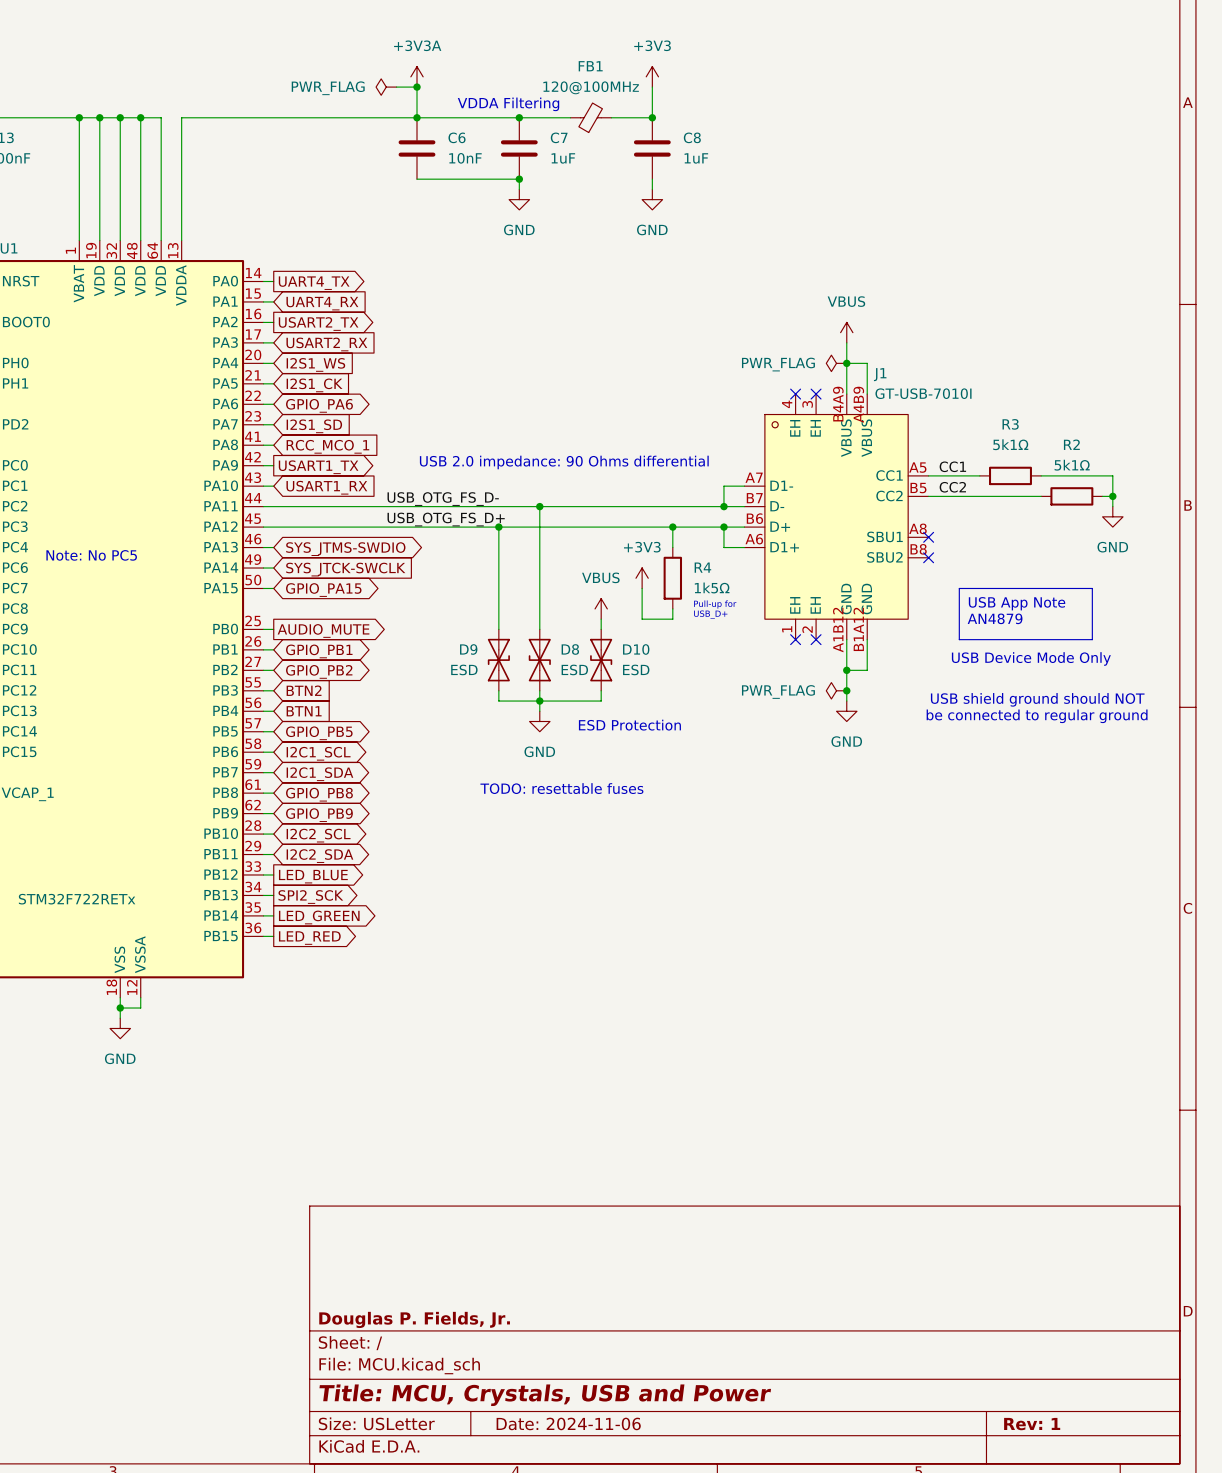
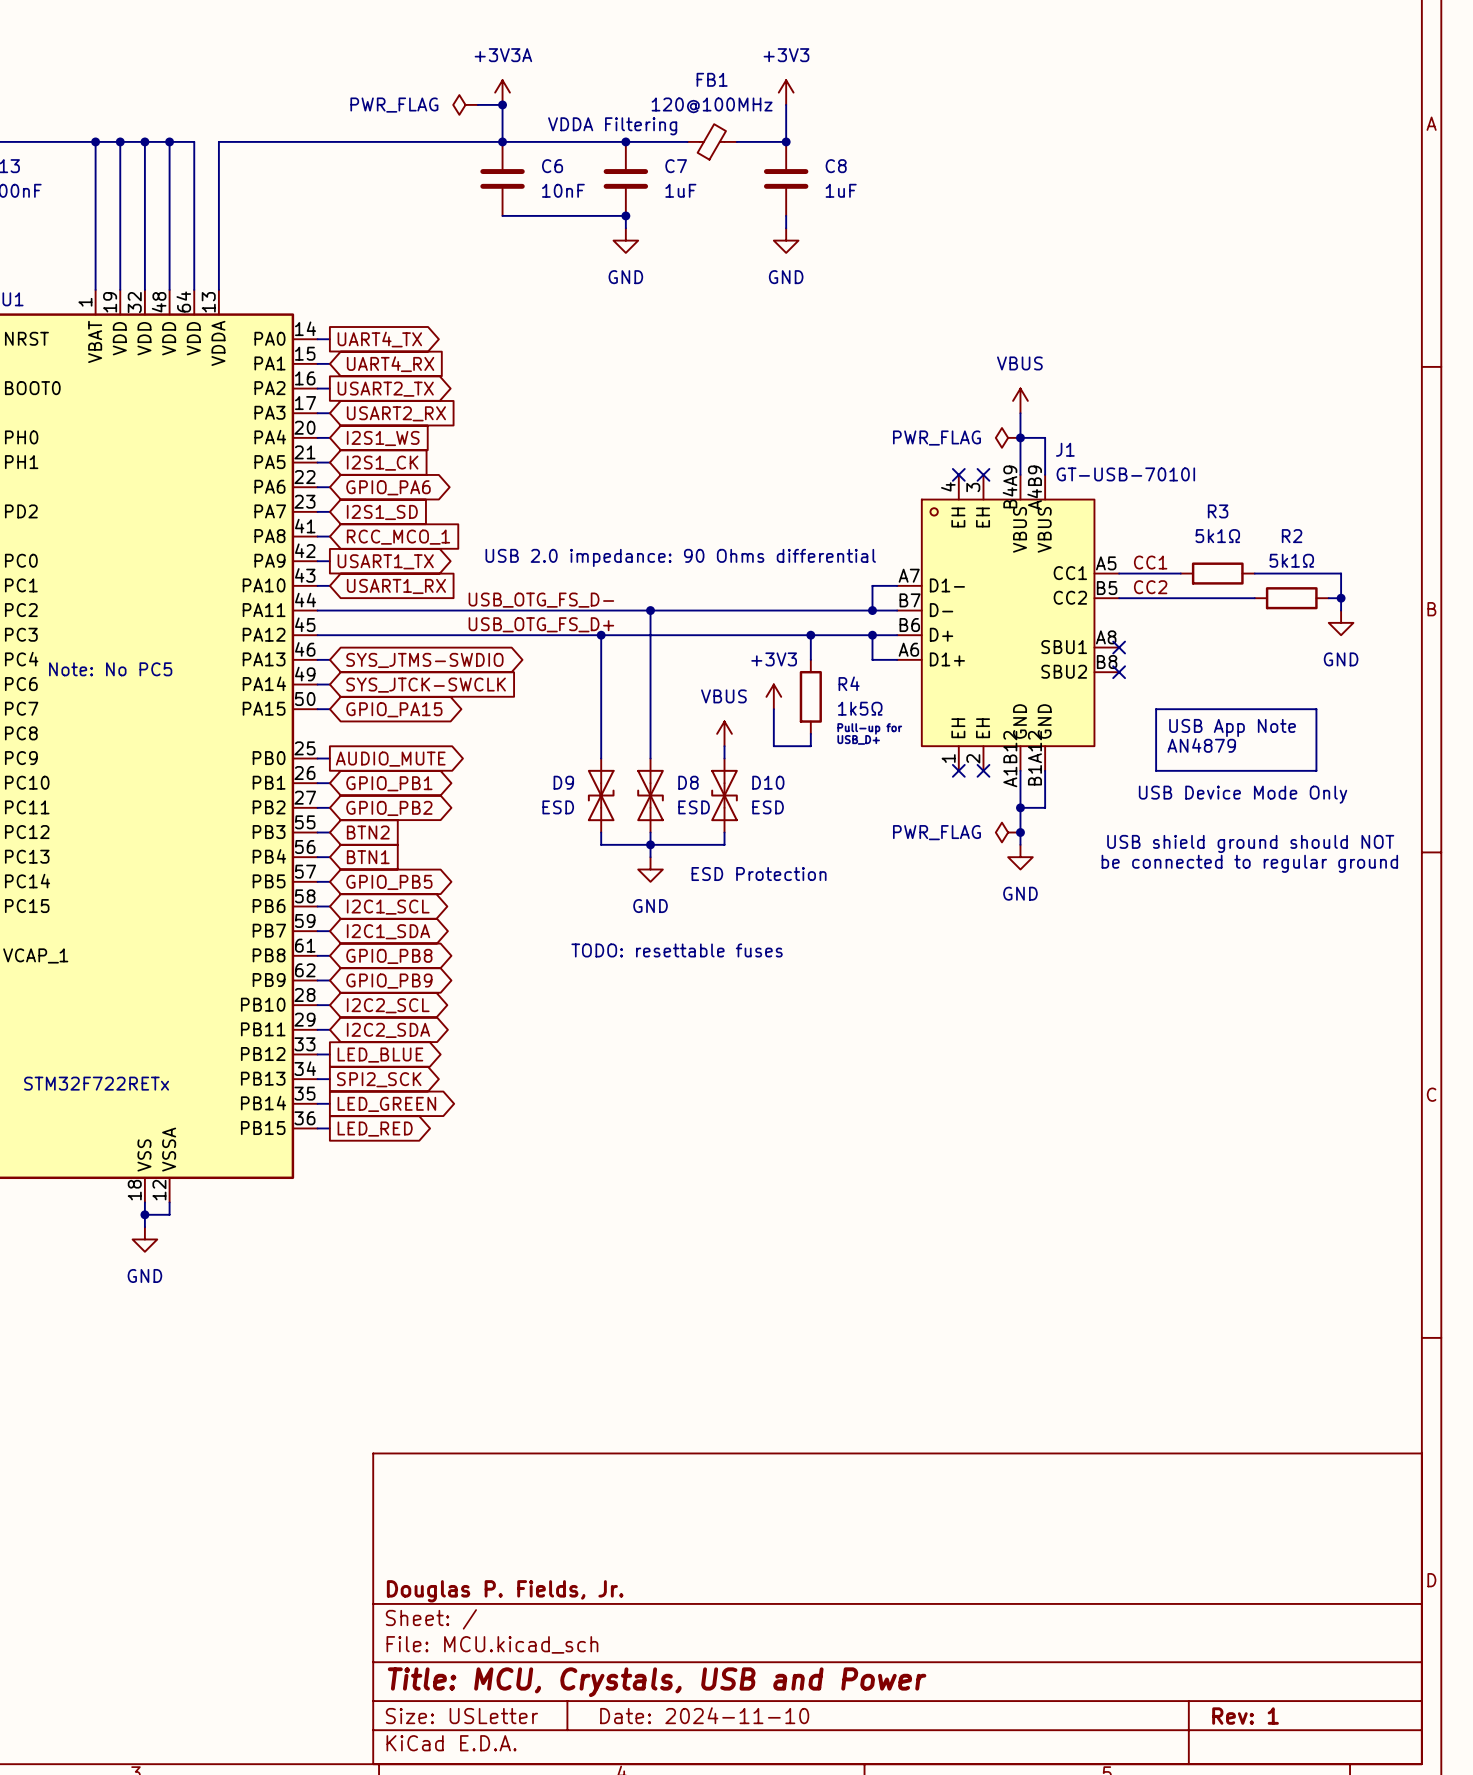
title block: Date: 2024-11-06 (568, 1423) -> Date: 2024-11-10 (704, 1715)

